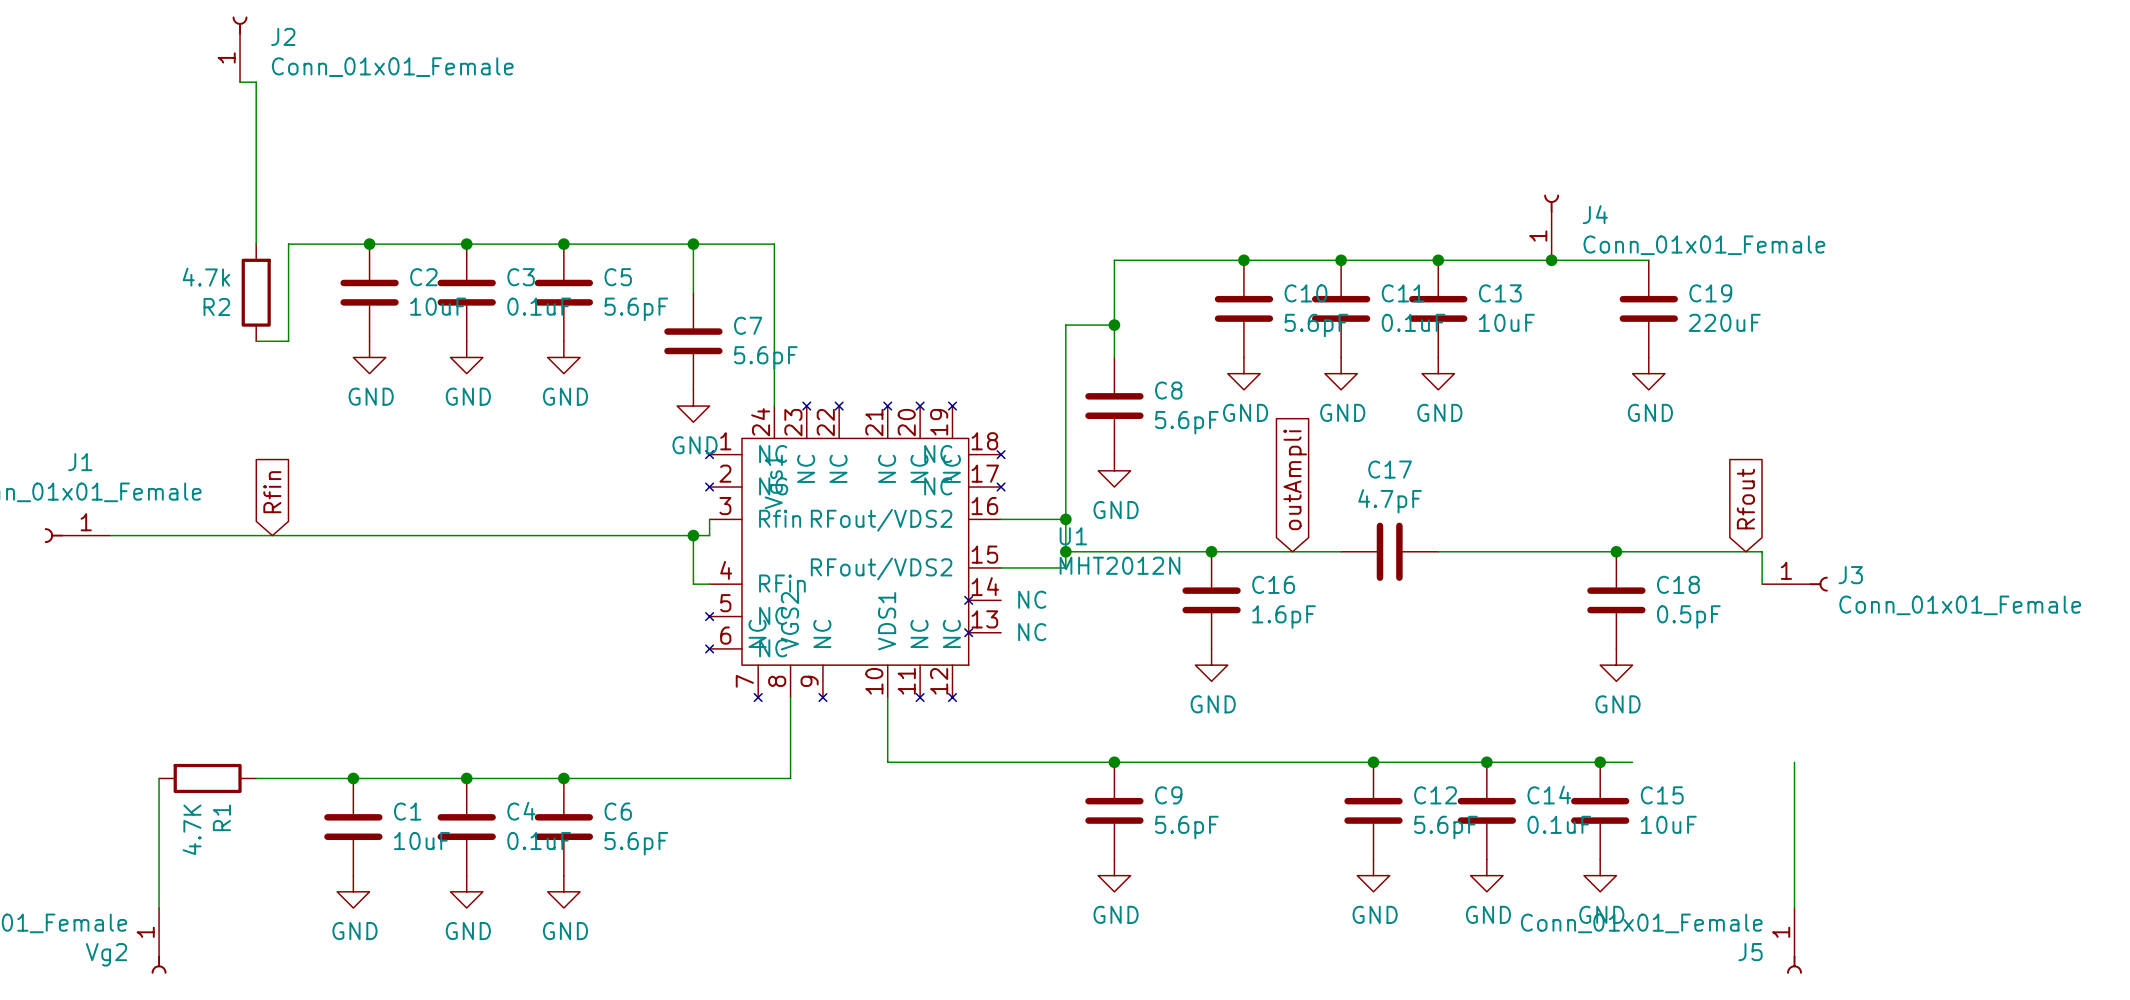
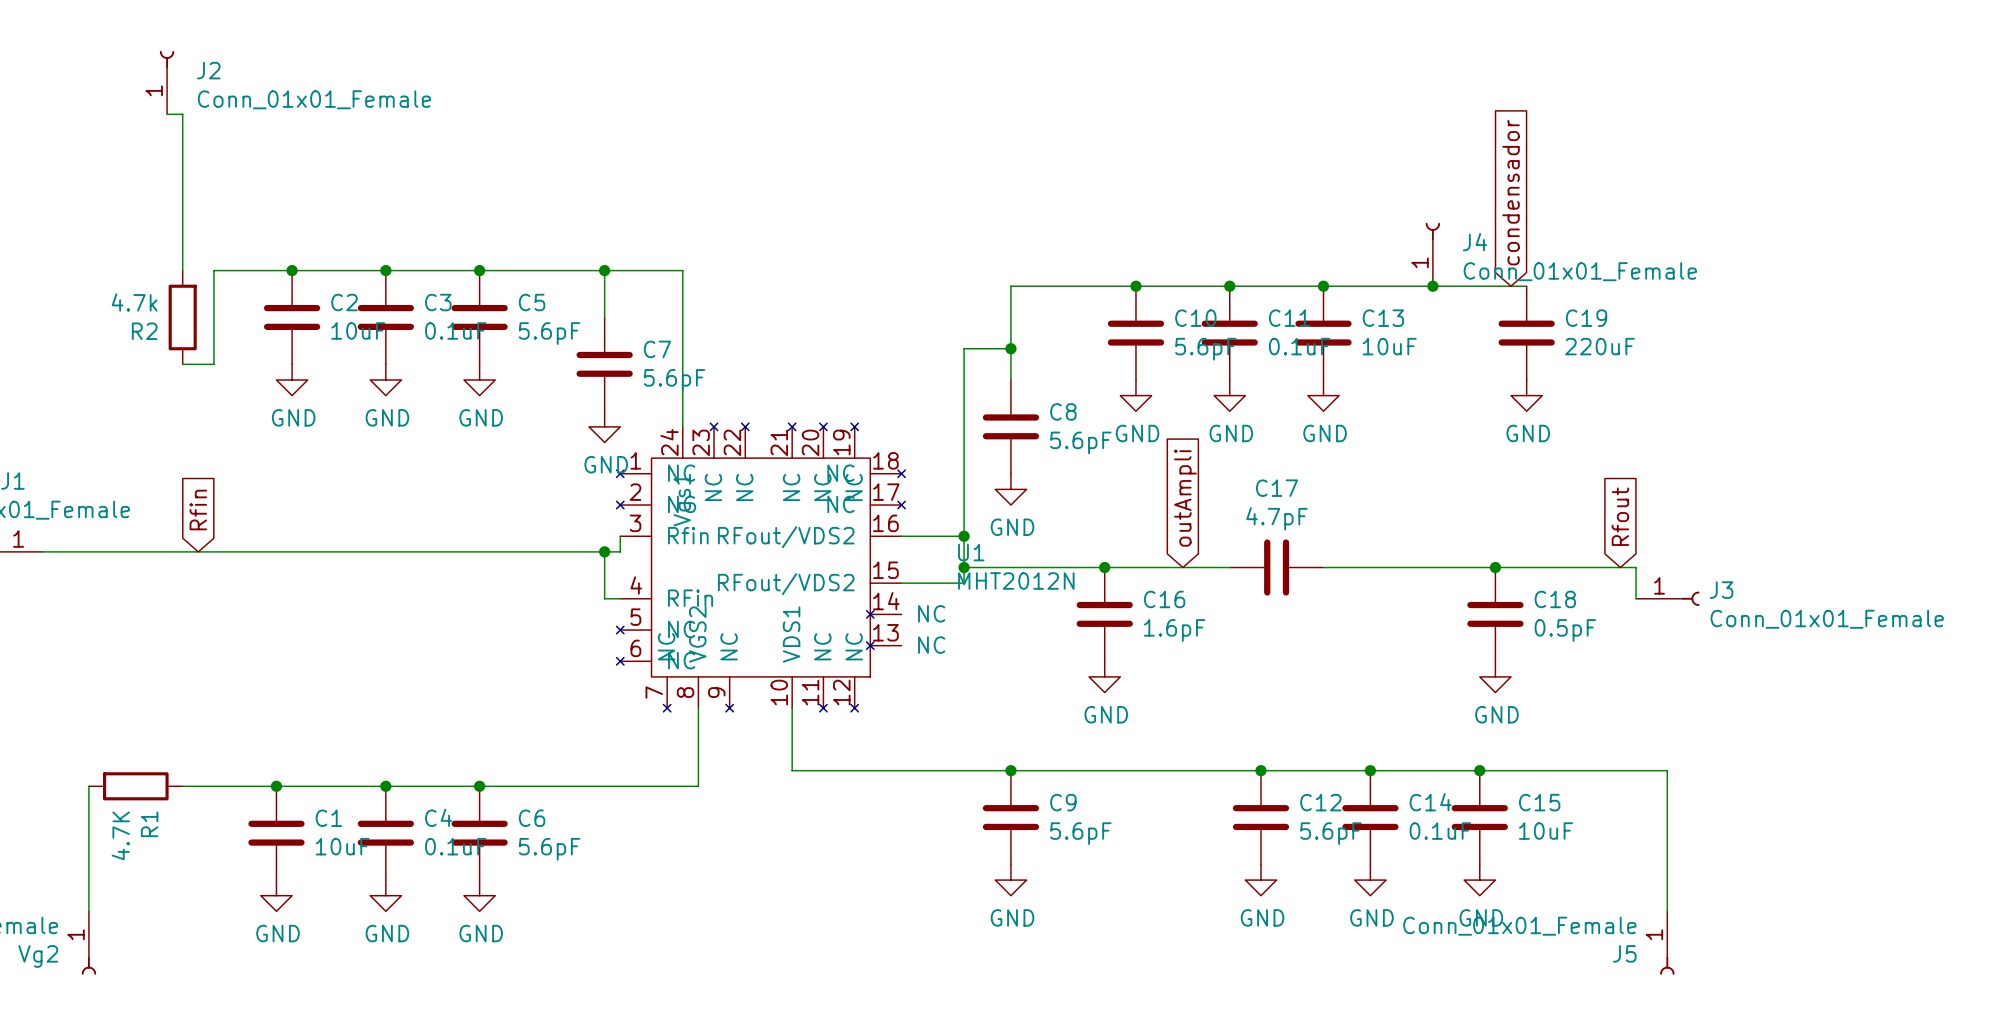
global label: none -> condensador (1511, 192)
wire: none -> (1511, 770) (1667, 770)

